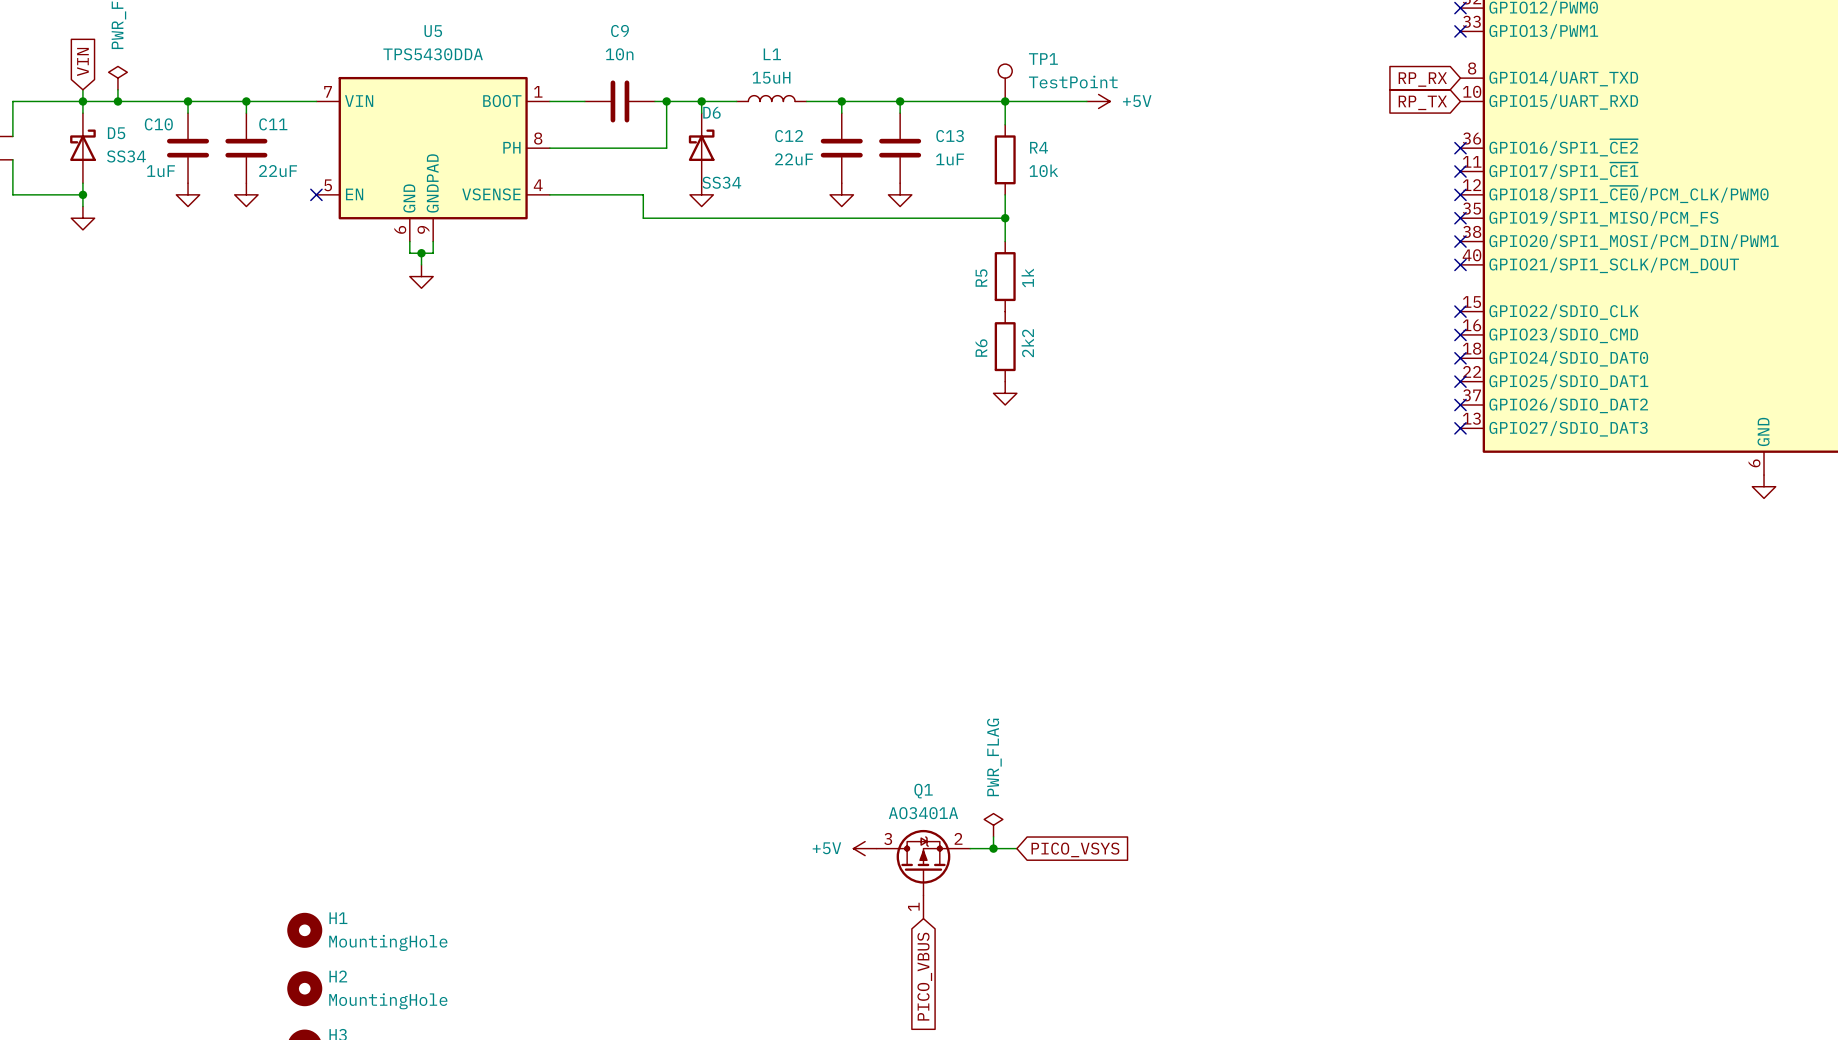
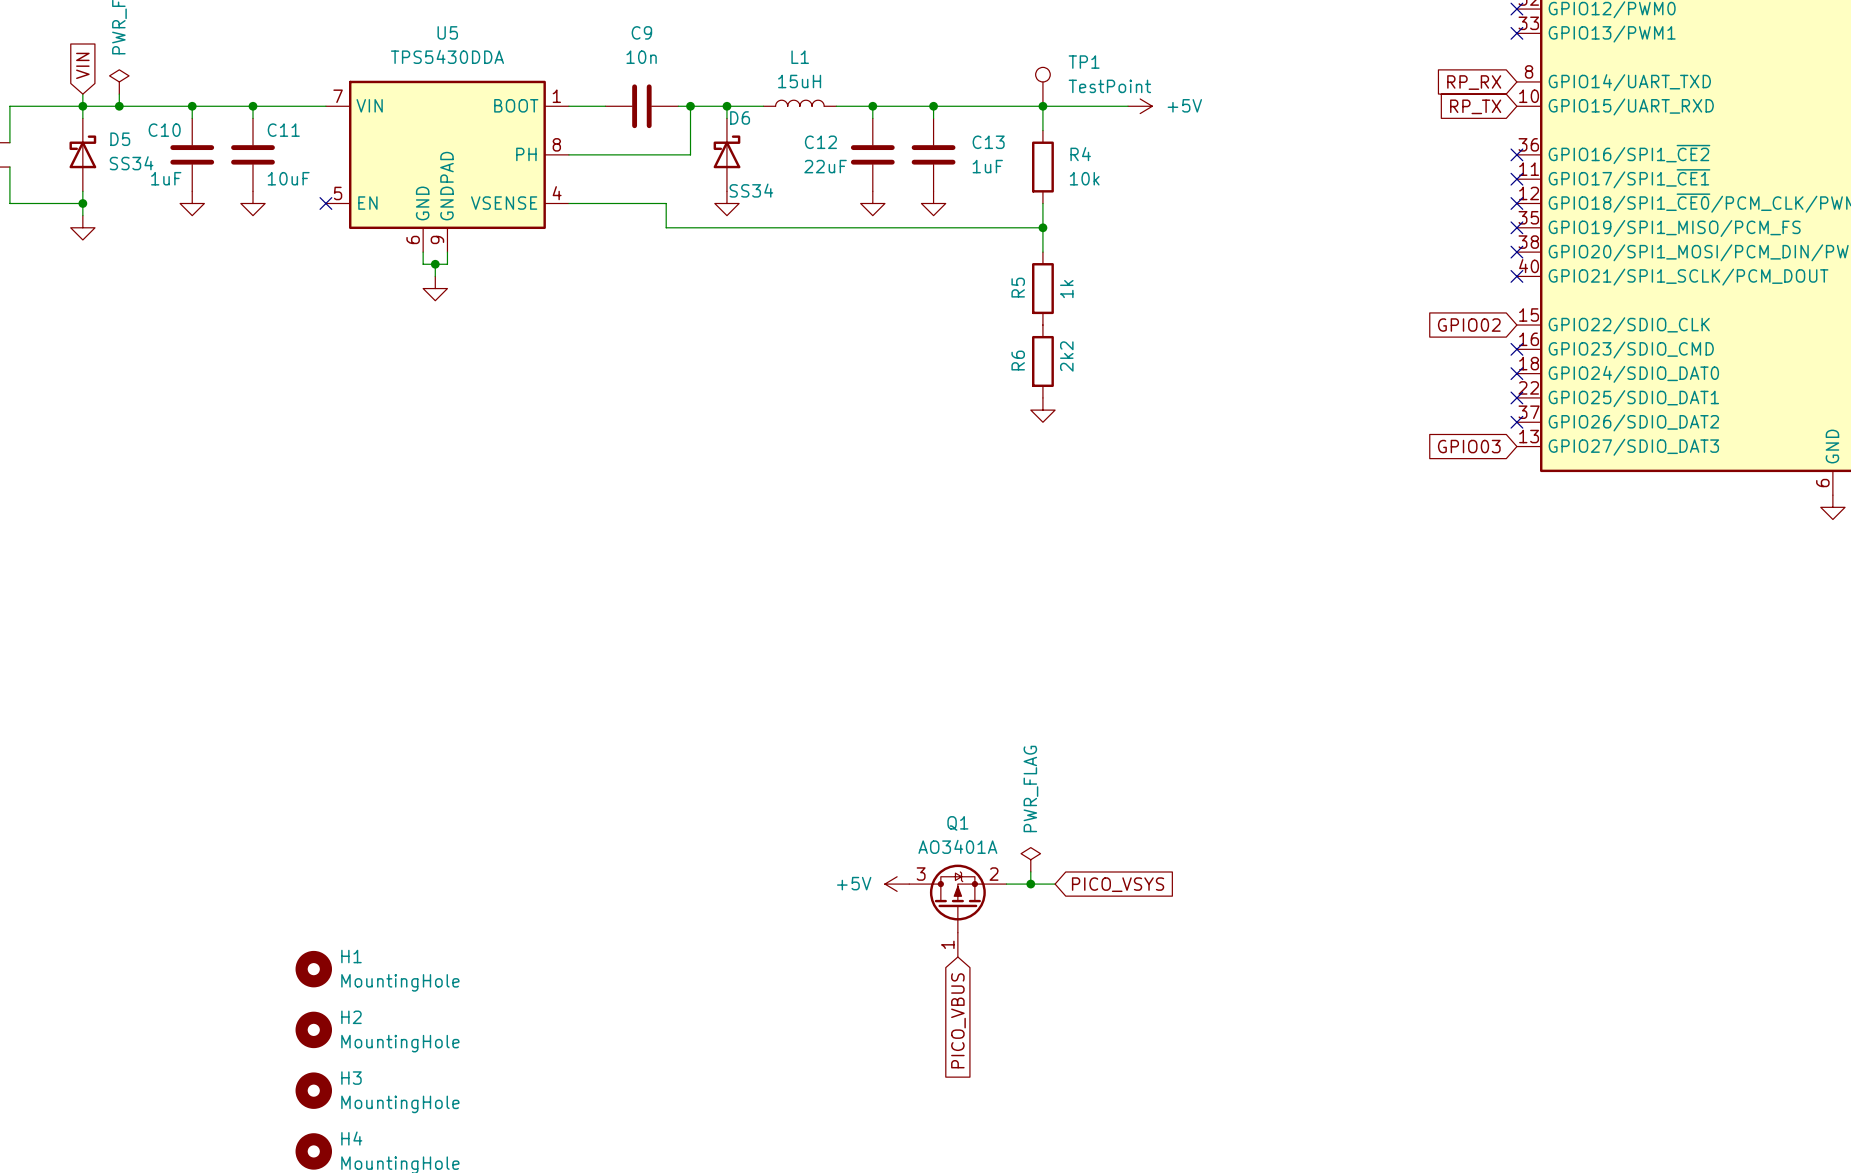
C11 value: 22uF (278, 171) -> 10uF (288, 178)
global label: none -> GPIO02 (1469, 325)
no-connect mark: (1460, 311) -> none
global label: none -> GPIO03 (1469, 446)
no-connect mark: (1460, 428) -> none

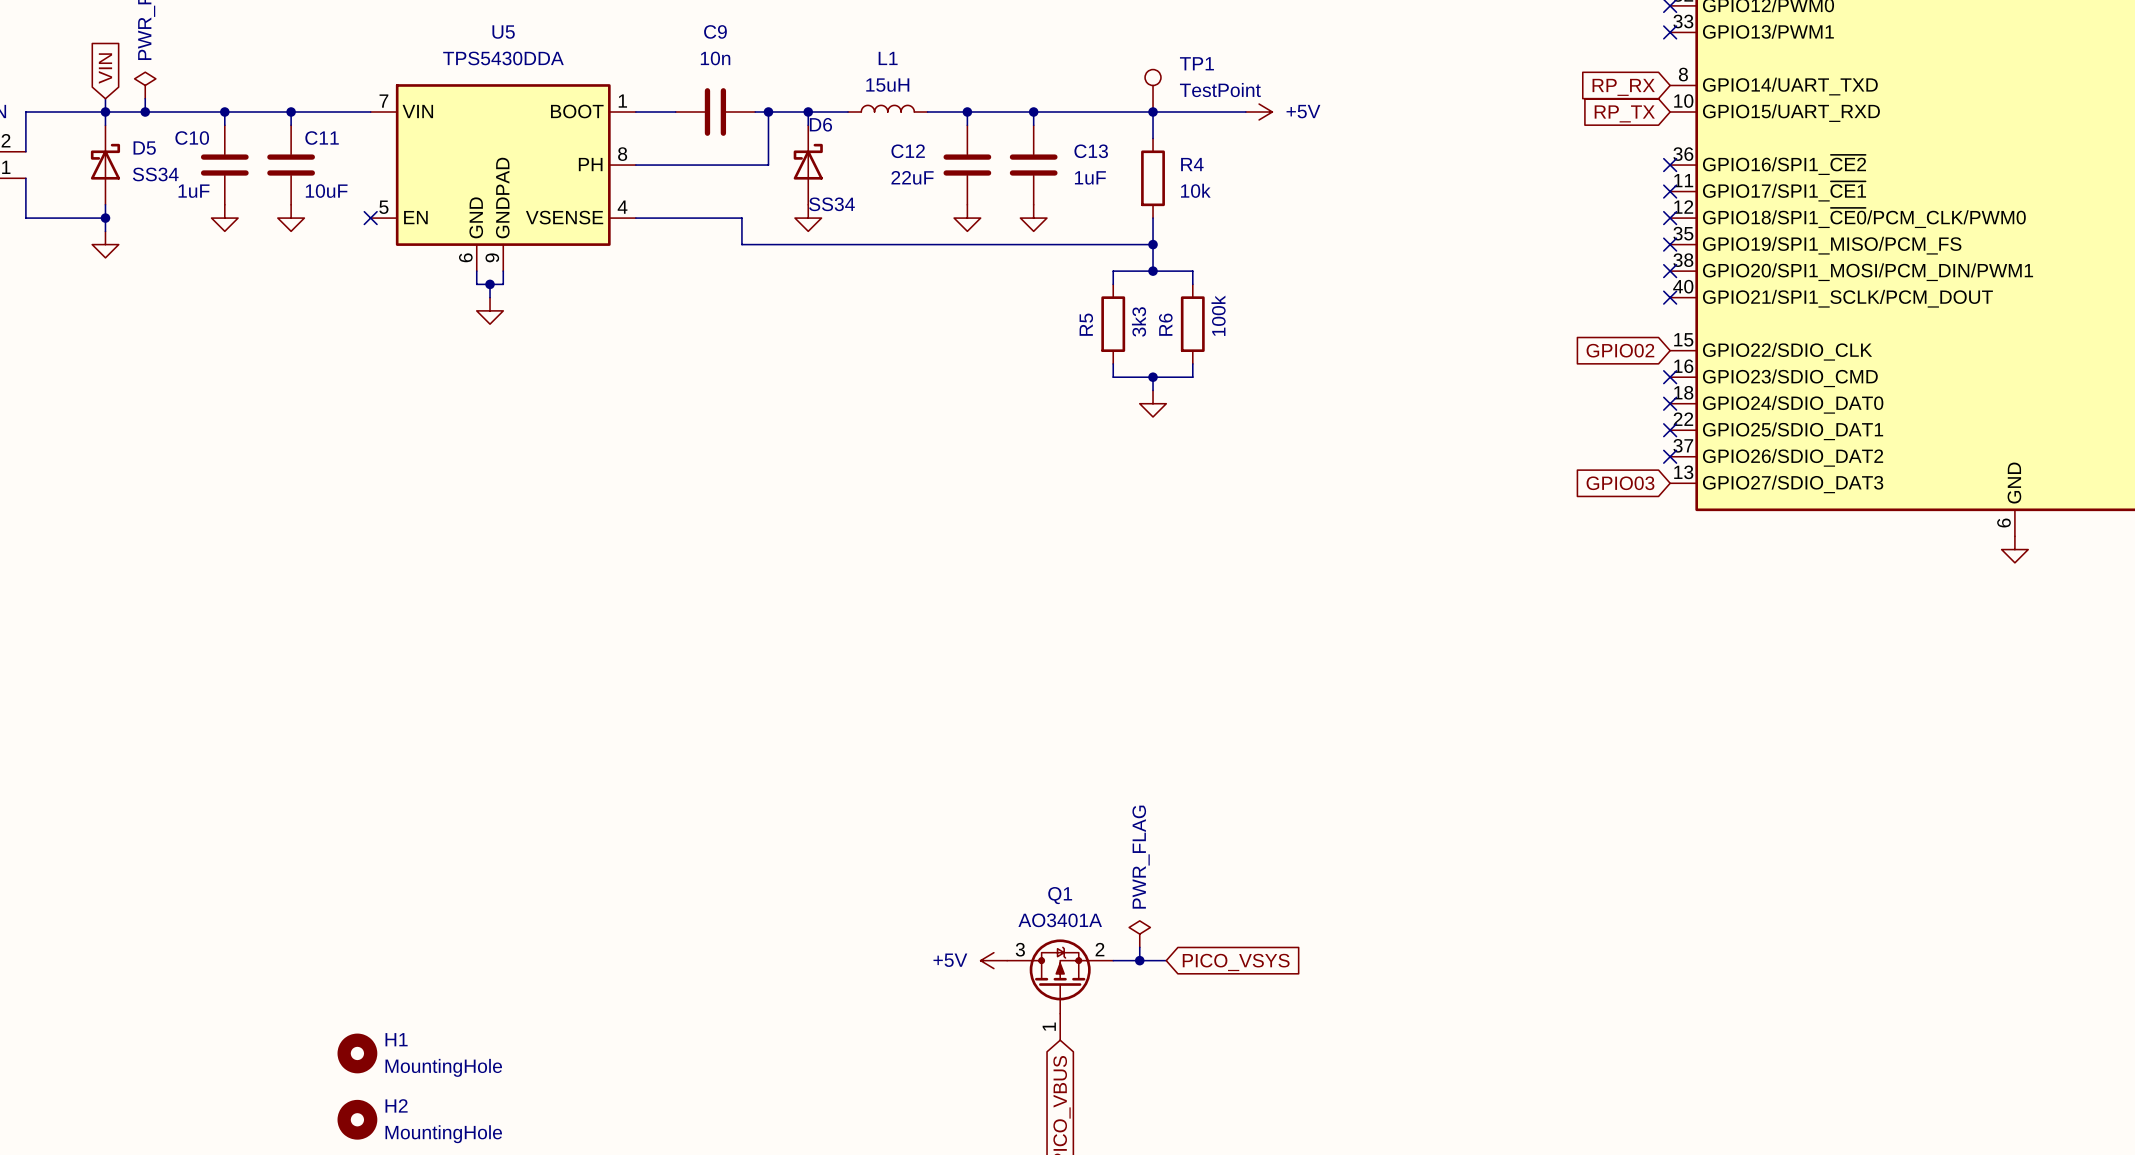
junction: none -> (1153, 271)
wire: none -> (1113, 284) (1113, 271) (1192, 271) (1192, 284)
R5 position: (1042, 288) -> (1113, 324)
R5 value: 1k (1066, 289) -> 3k3 (1139, 321)
wire: none -> (1113, 363) (1113, 377) (1192, 377) (1192, 363)
wire: none -> (1153, 377) (1153, 390)
junction: none -> (1153, 377)
R6 value: 2k2 (1066, 356) -> 100k (1218, 315)
R6 position: (1042, 361) -> (1192, 324)
power symbol position: (1042, 410) -> (1153, 403)

